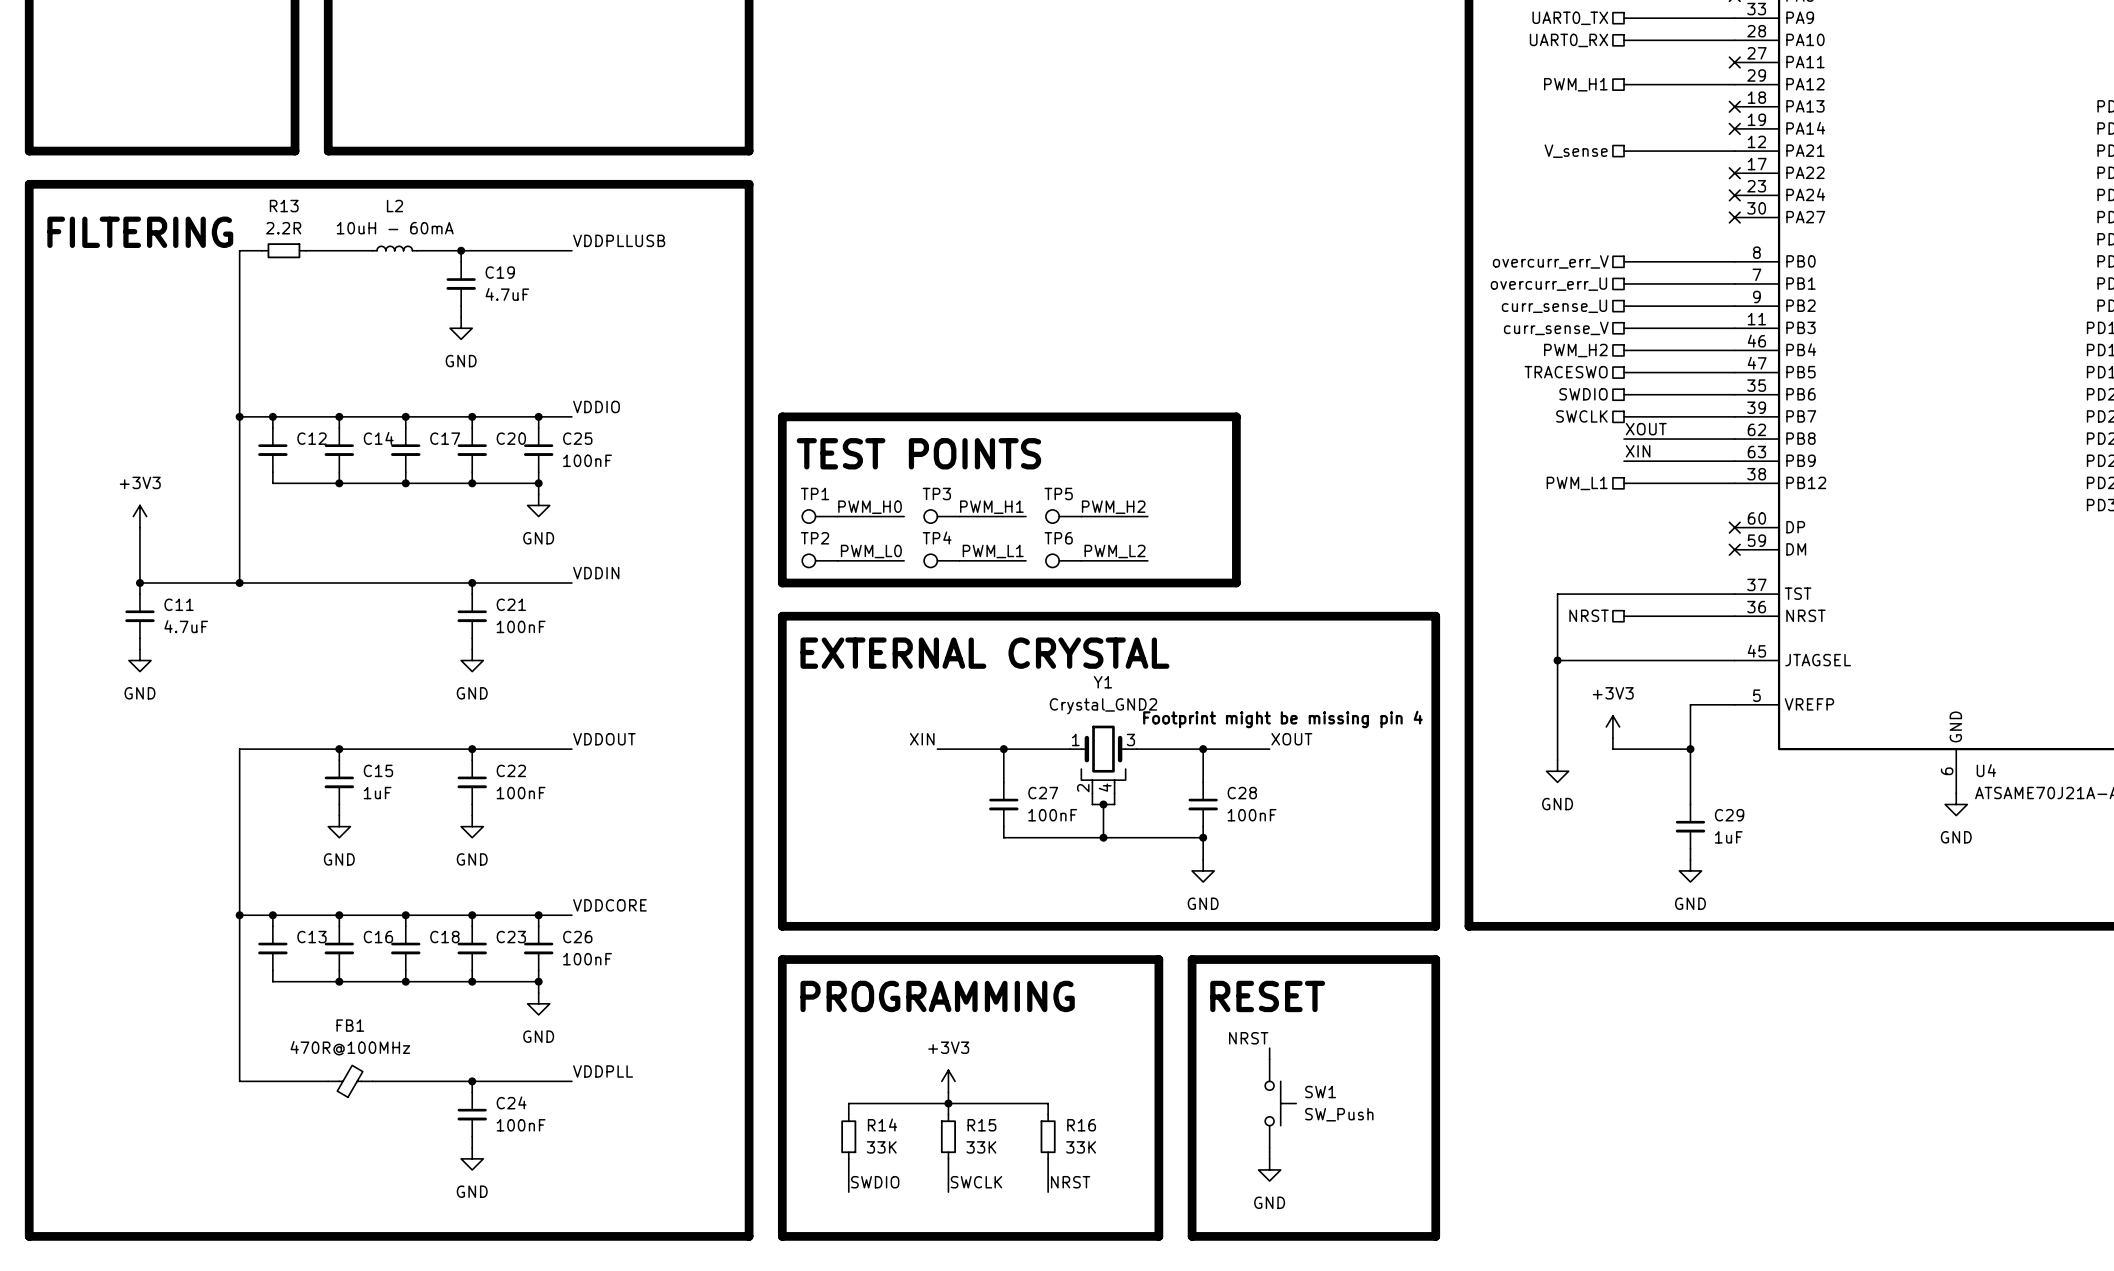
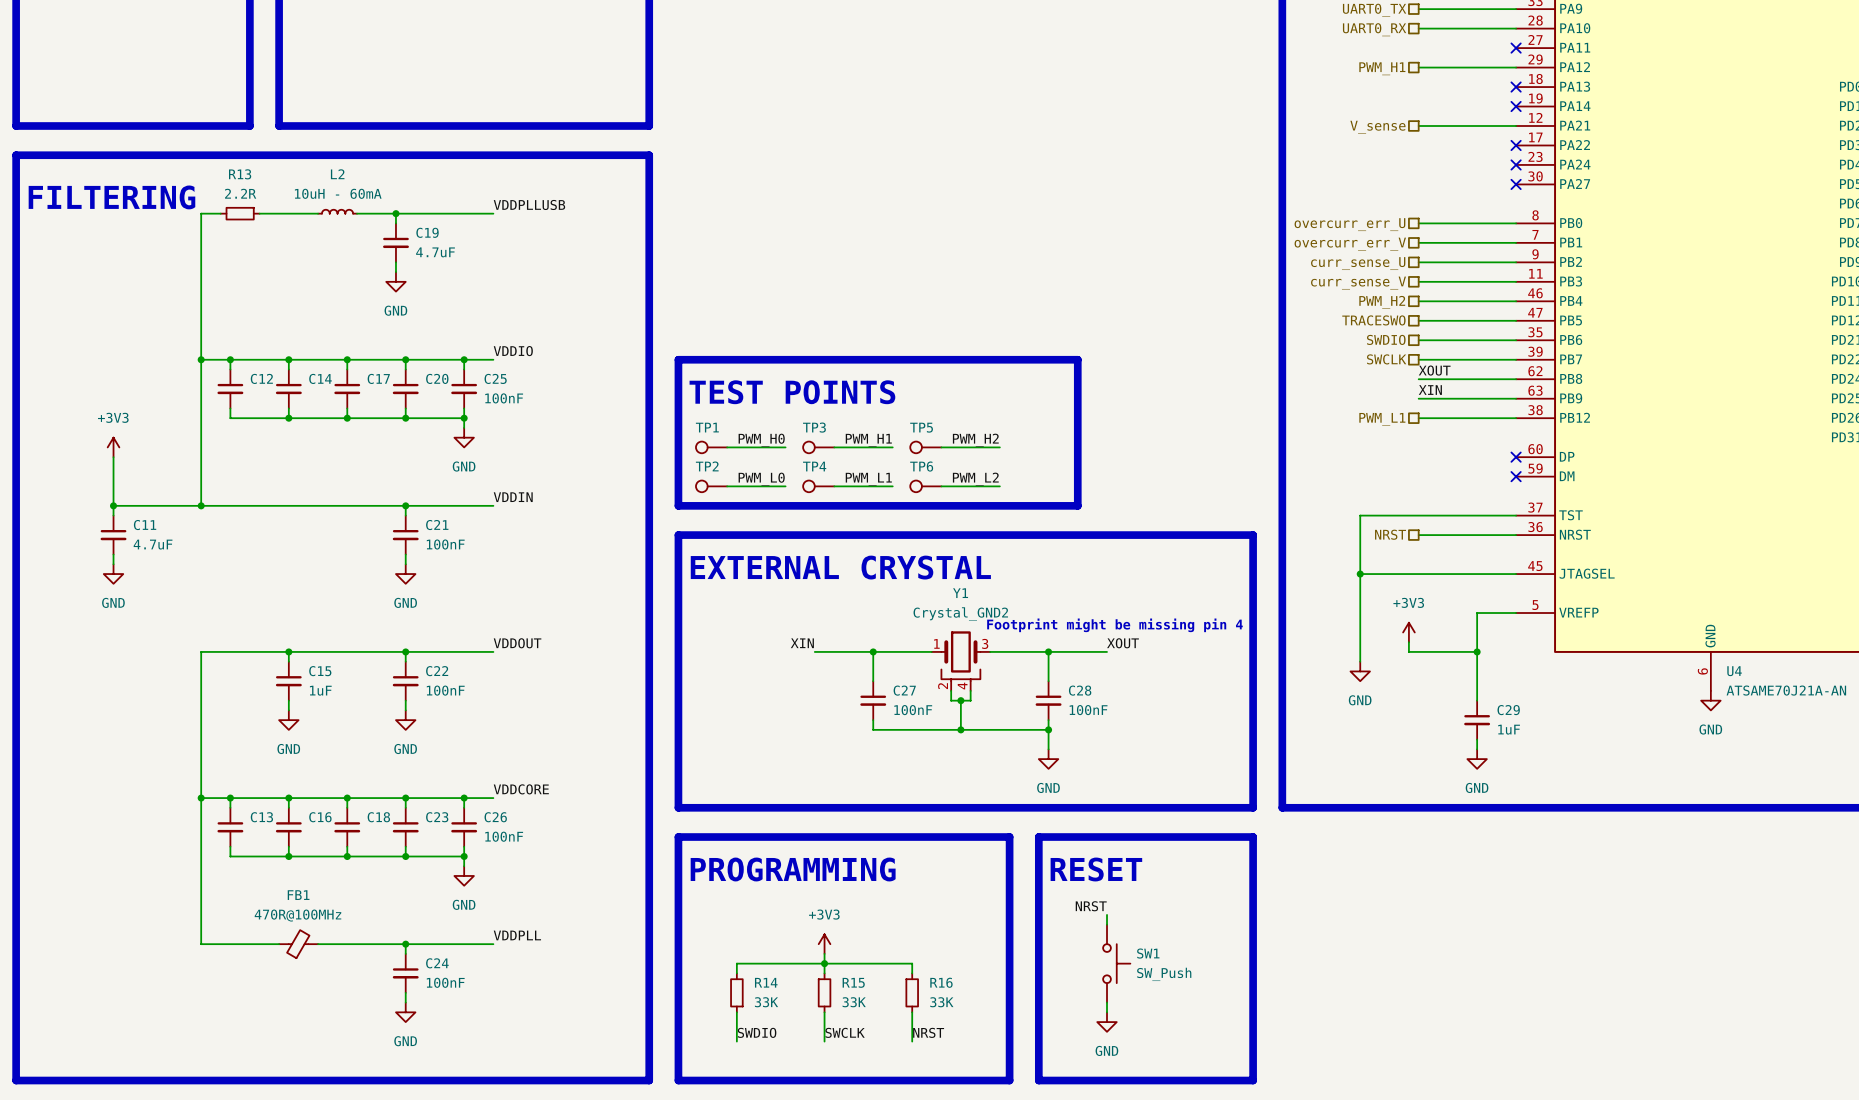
hierarchical label: overcurr_err_V (1550, 261) -> overcurr_err_U (1349, 224)
hierarchical label: overcurr_err_U (1548, 284) -> overcurr_err_V (1350, 244)

